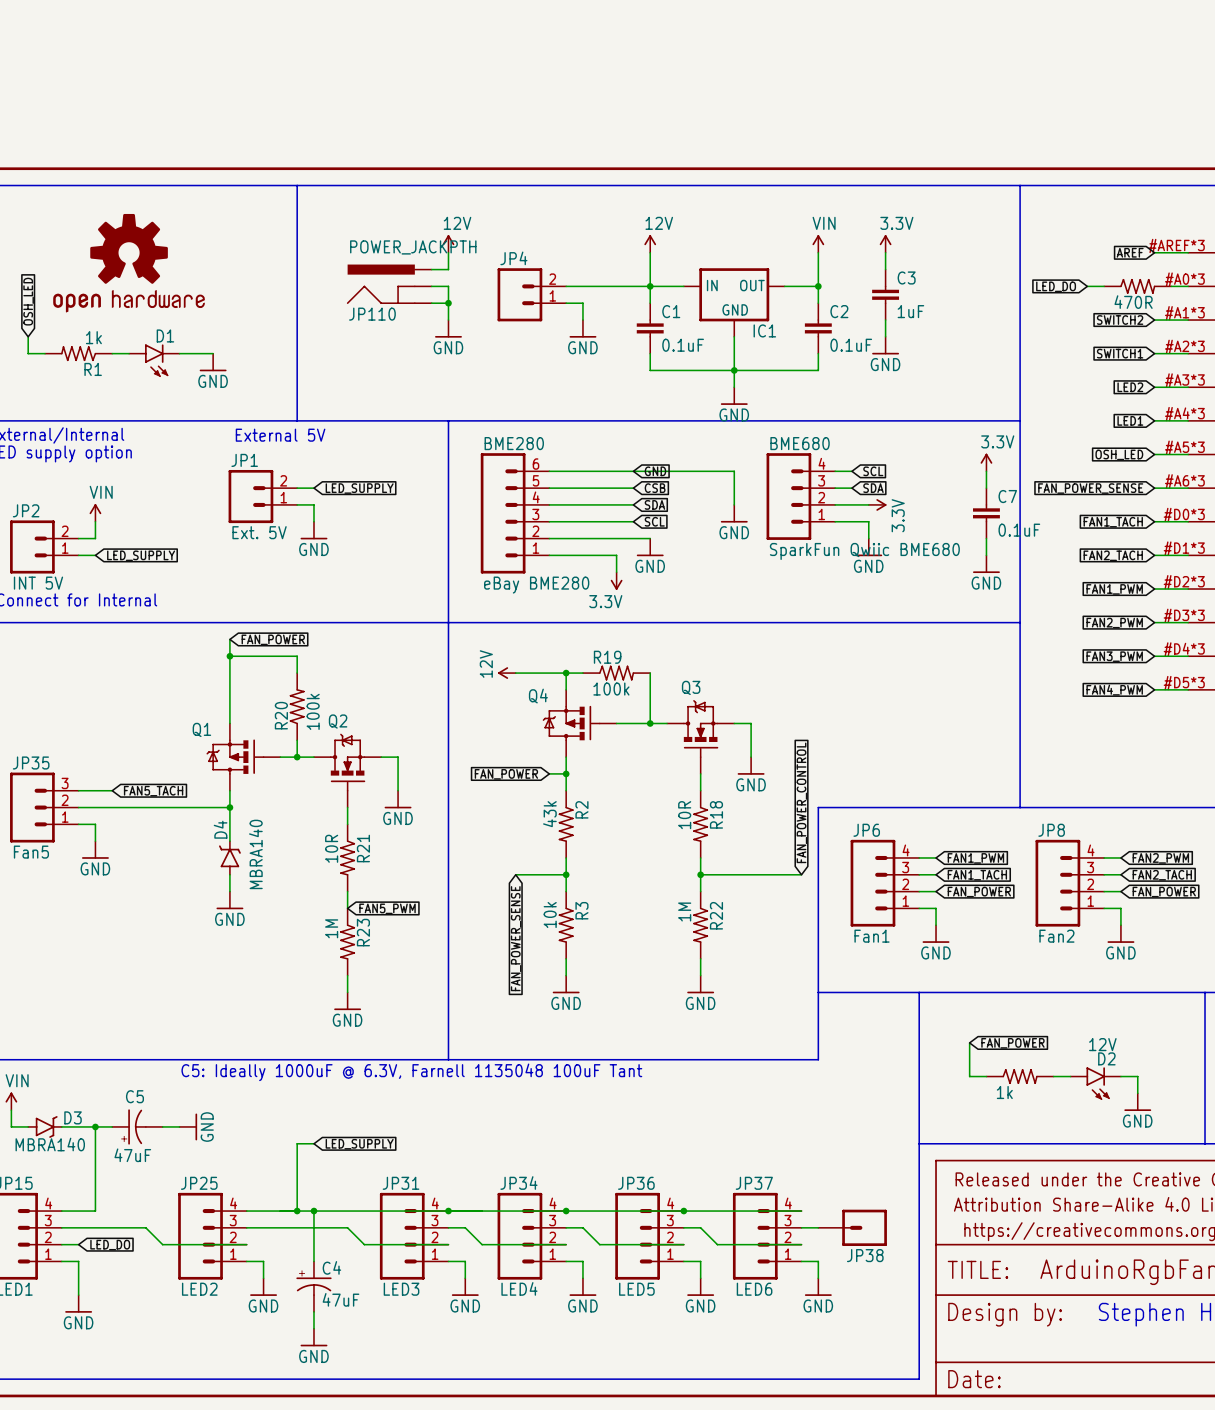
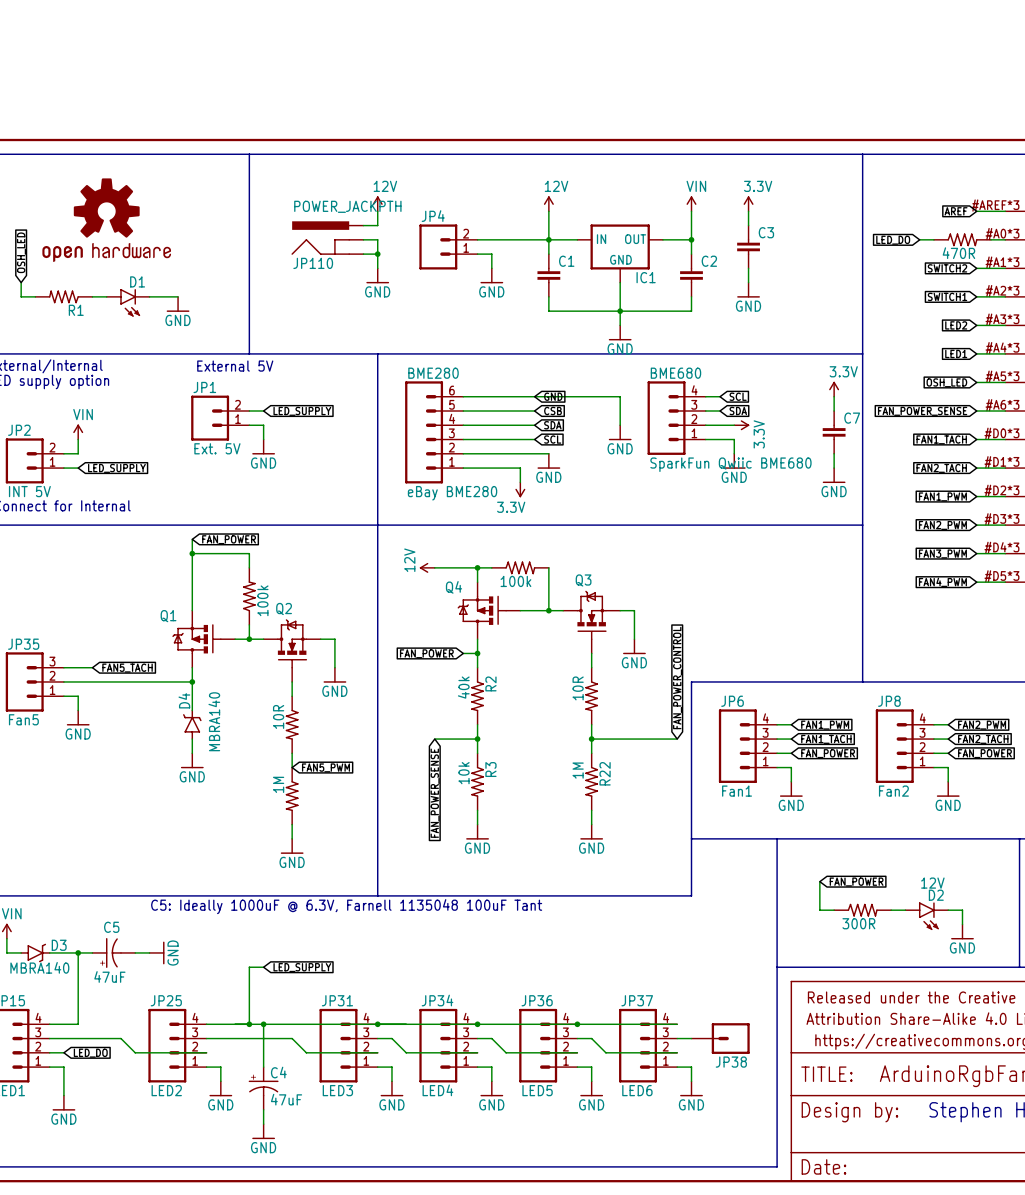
C3 value: 1uF (910, 311) -> none
R1 value: 1k (93, 337) -> none
C1 value: 0.1uF (683, 345) -> none
C2 value: 0.1uF (851, 345) -> none
C7 value: 0.1uF (1019, 530) -> none
R19 name: R19 (607, 657) -> none
R20 name: R20 (281, 715) -> none
R2 value: 43k (549, 814) -> 40k (463, 687)
R18 name: R18 (716, 814) -> none
R21 name: R21 (363, 848) -> none
R23 name: R23 (363, 932) -> none
part value: 1k (1004, 1092) -> 300R (858, 923)

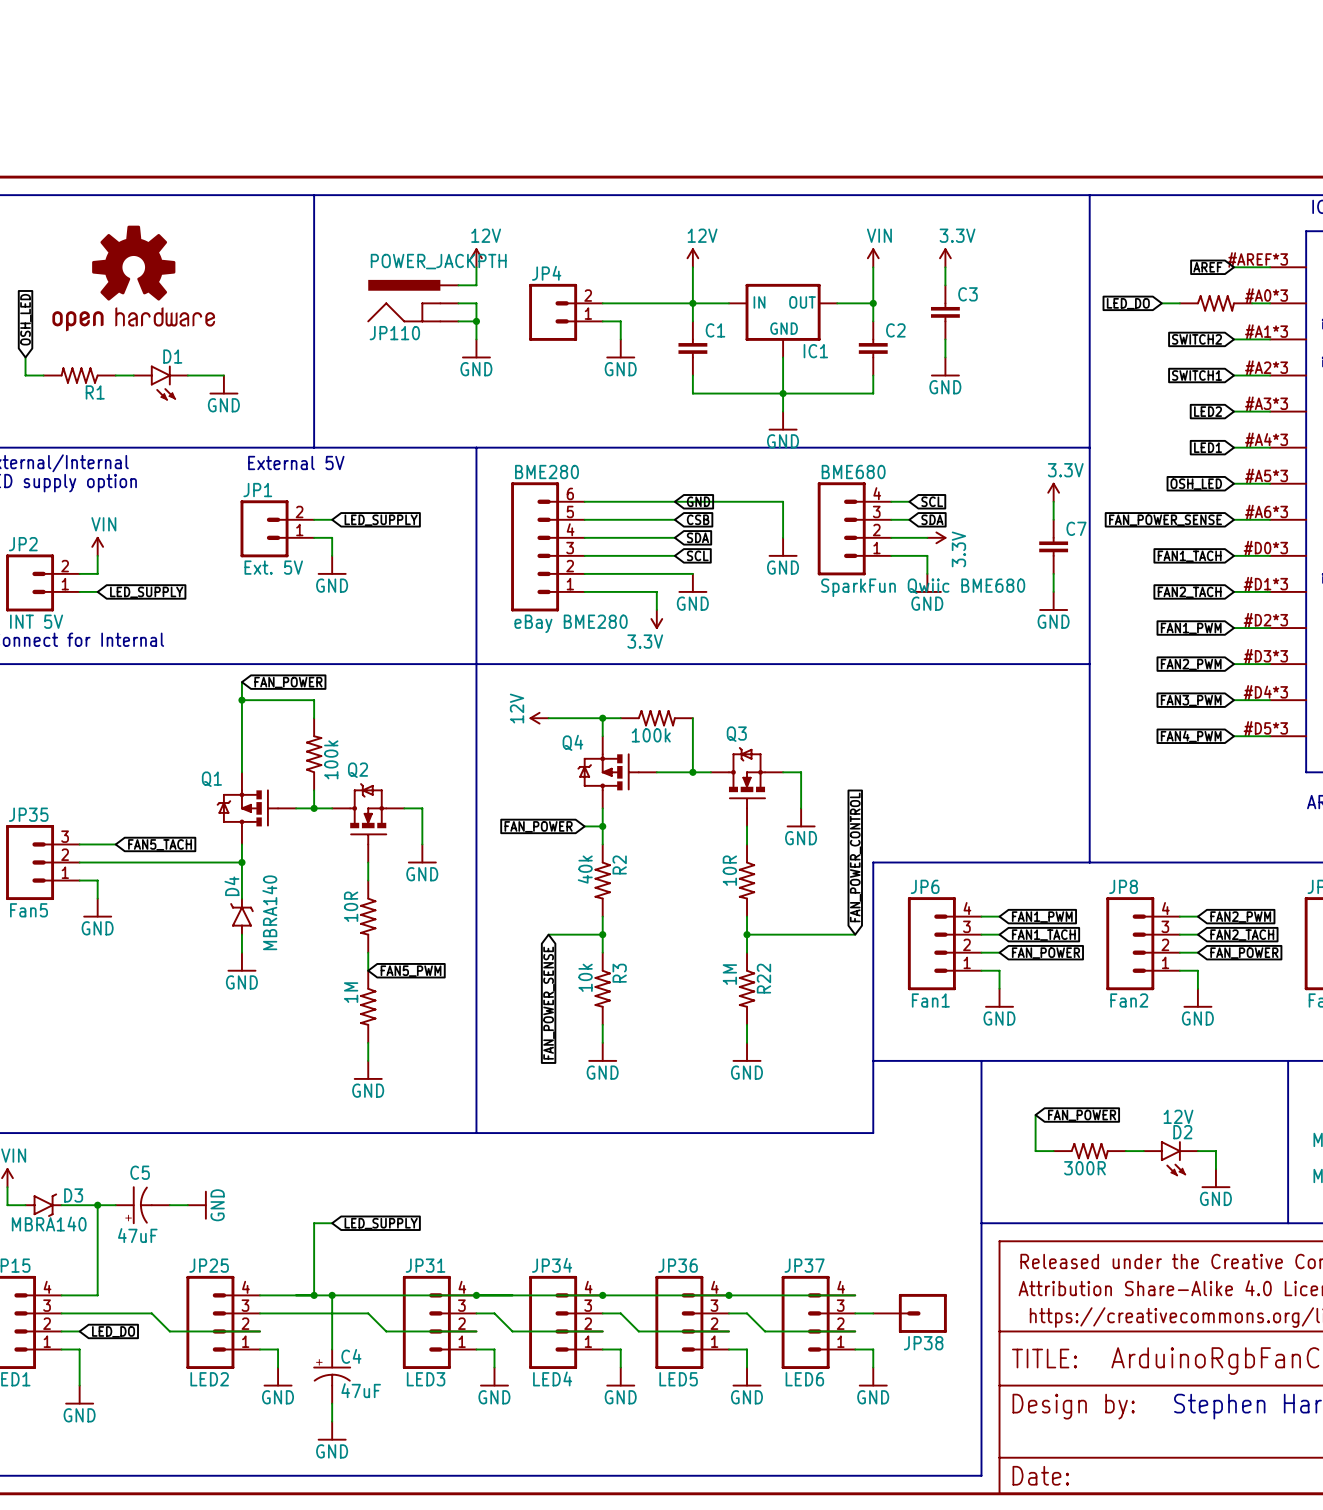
part value: 470R (958, 253) -> none
text: C5: Ideally 1000uF @ 6.3V, Farnell 1135048 100uF Tant (346, 906) -> none

